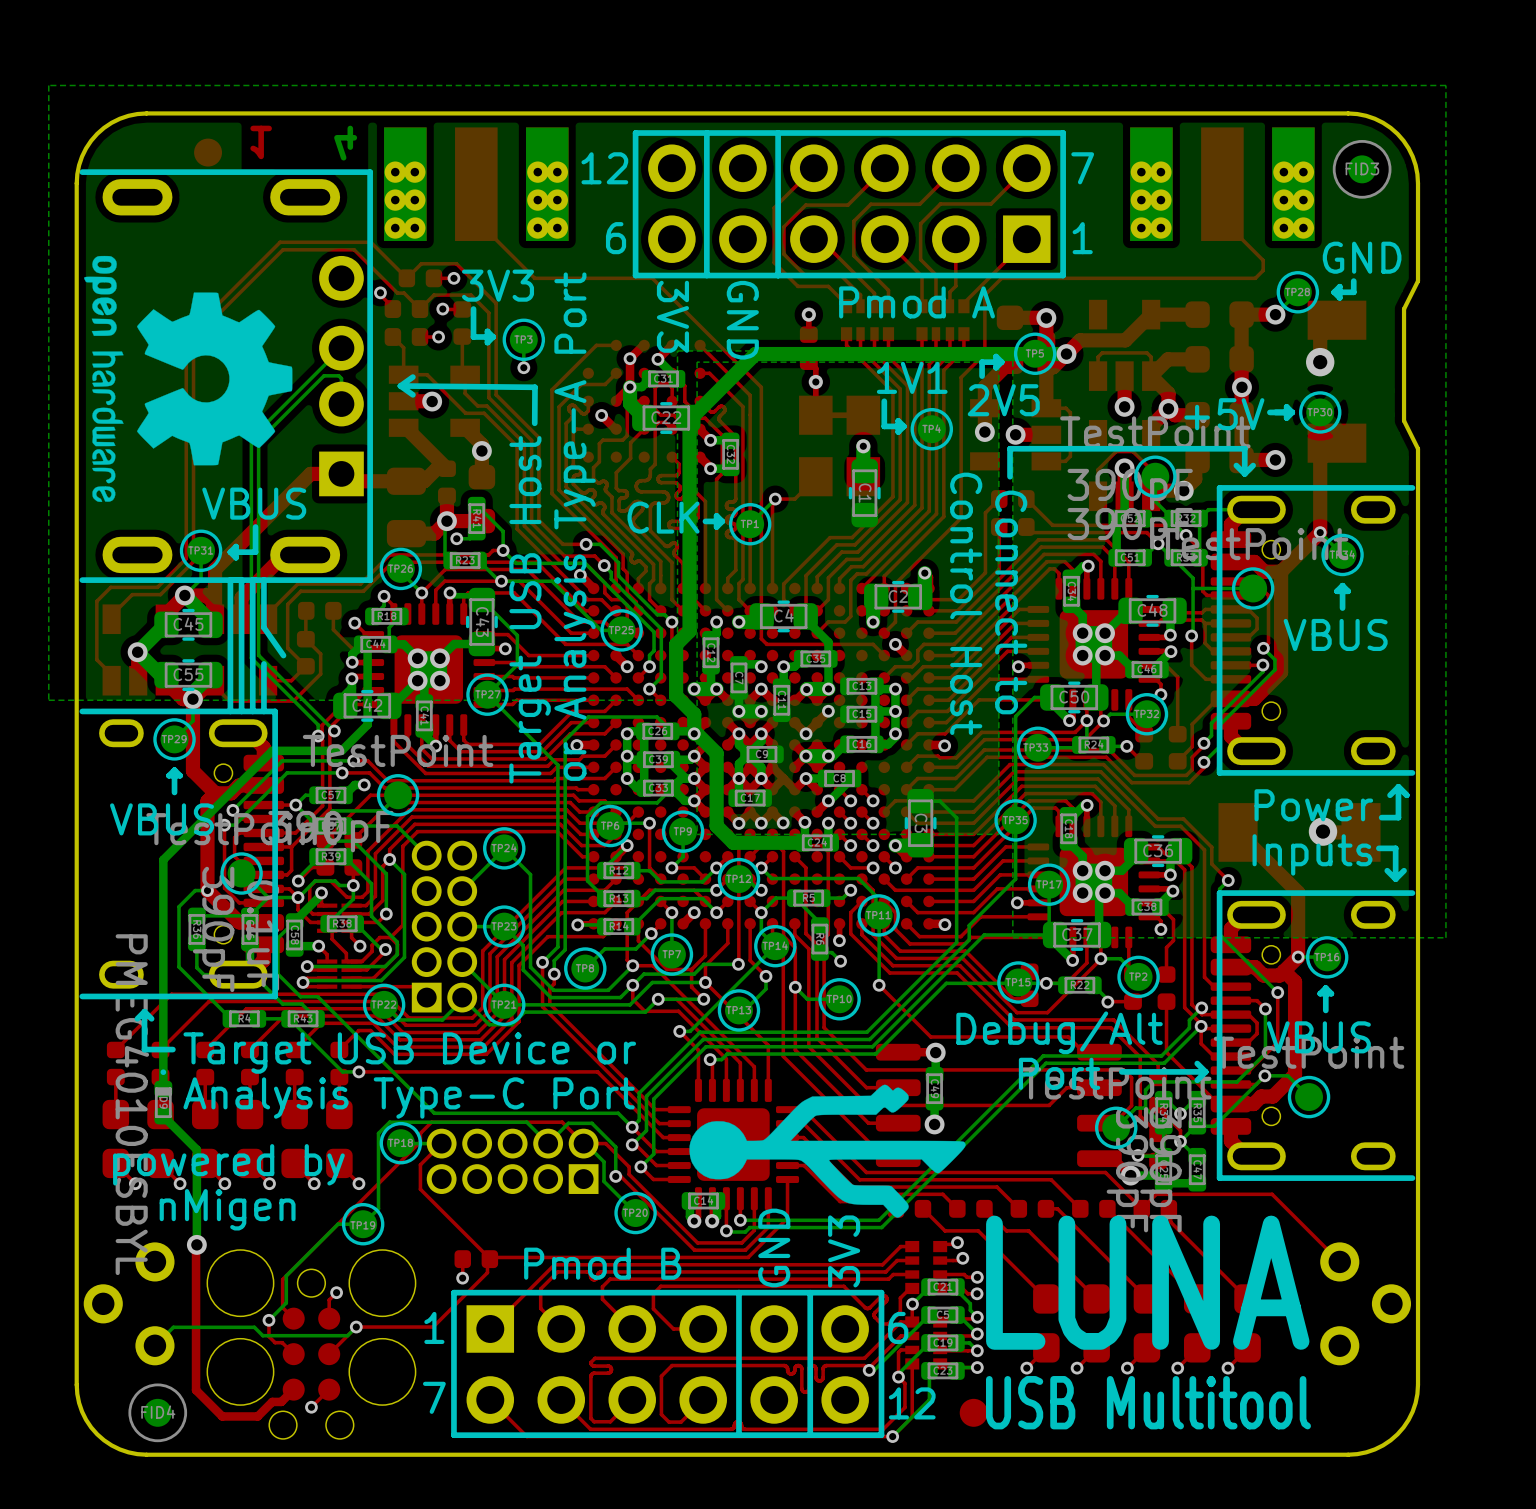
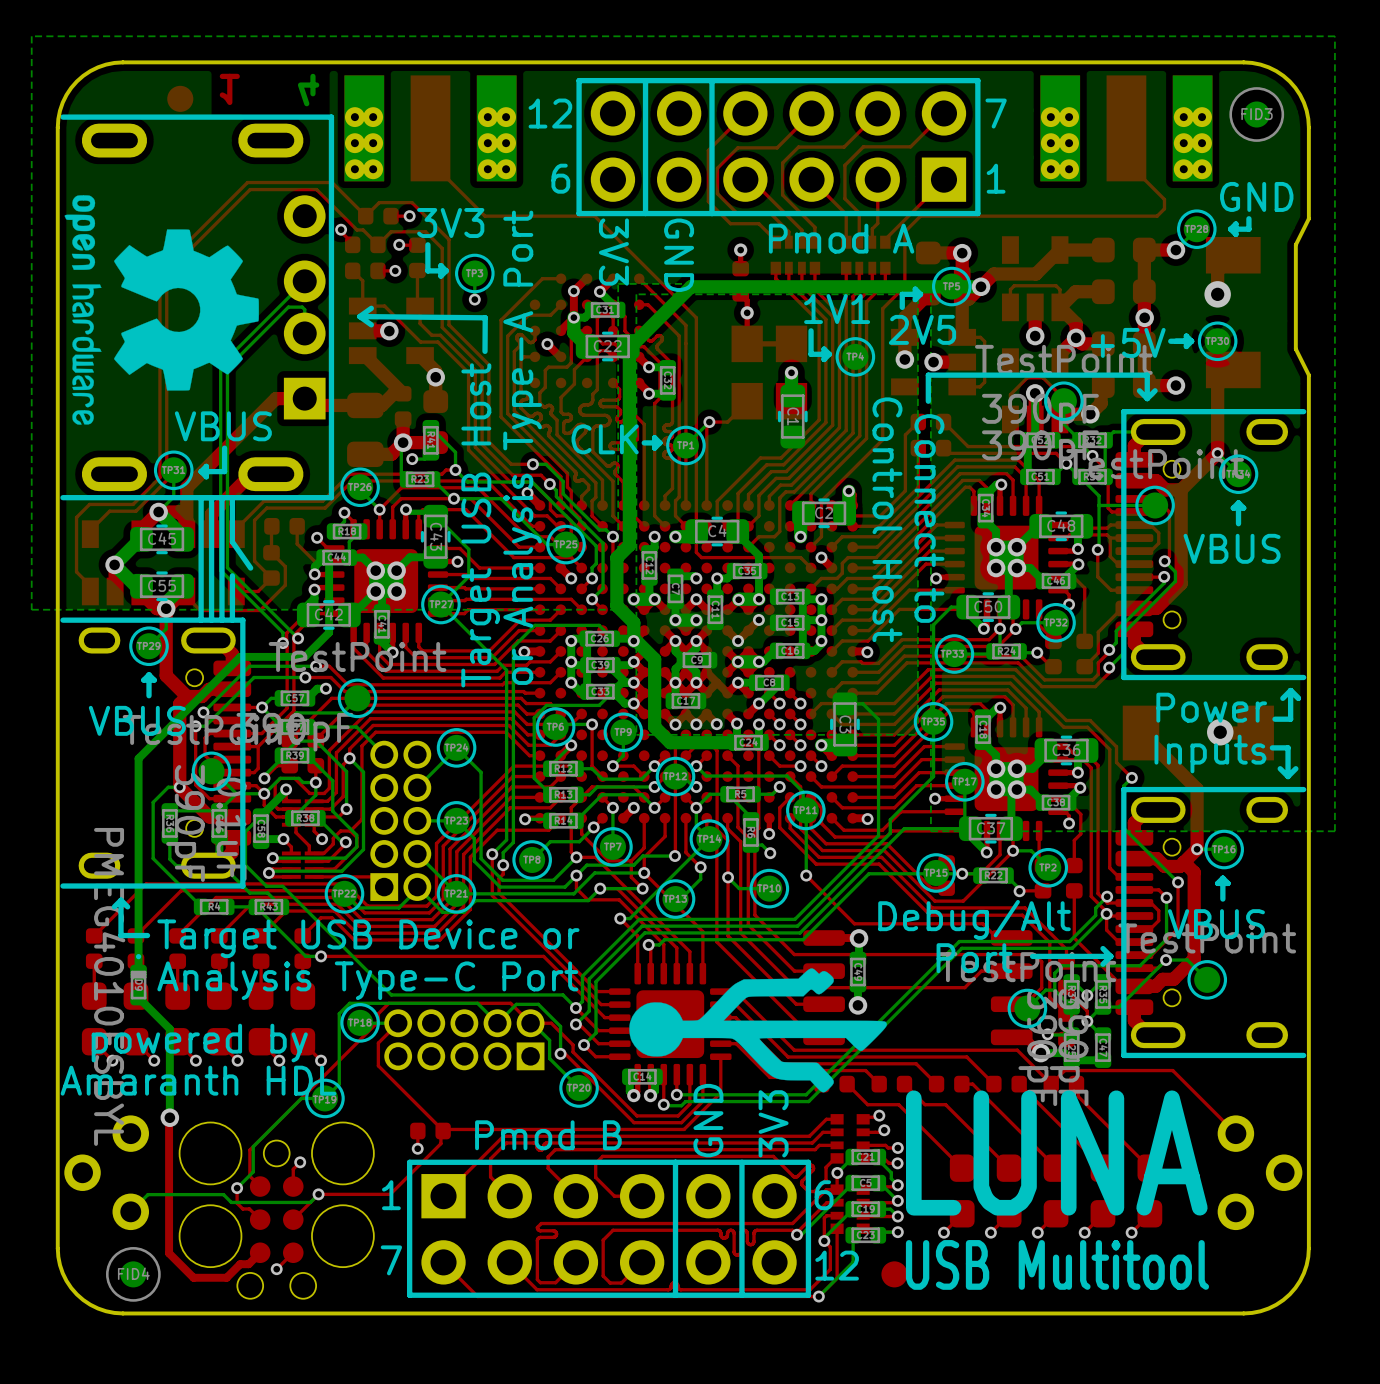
text: nMigen (227, 1209) -> Amaranth HDL (198, 1080)

